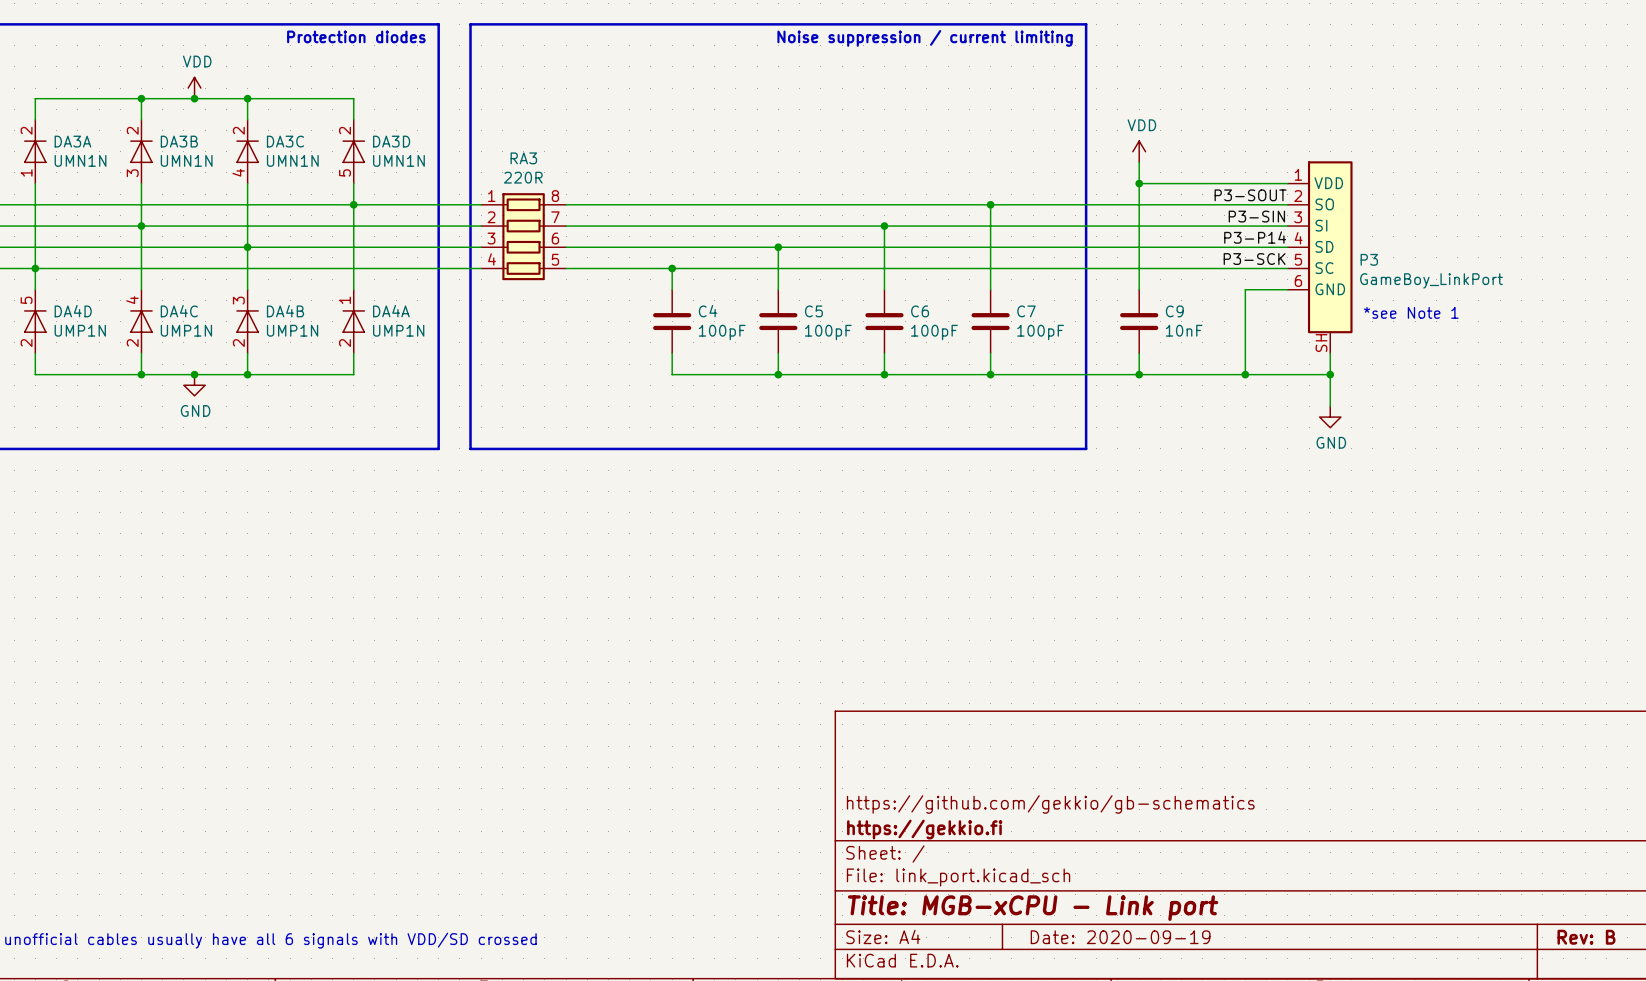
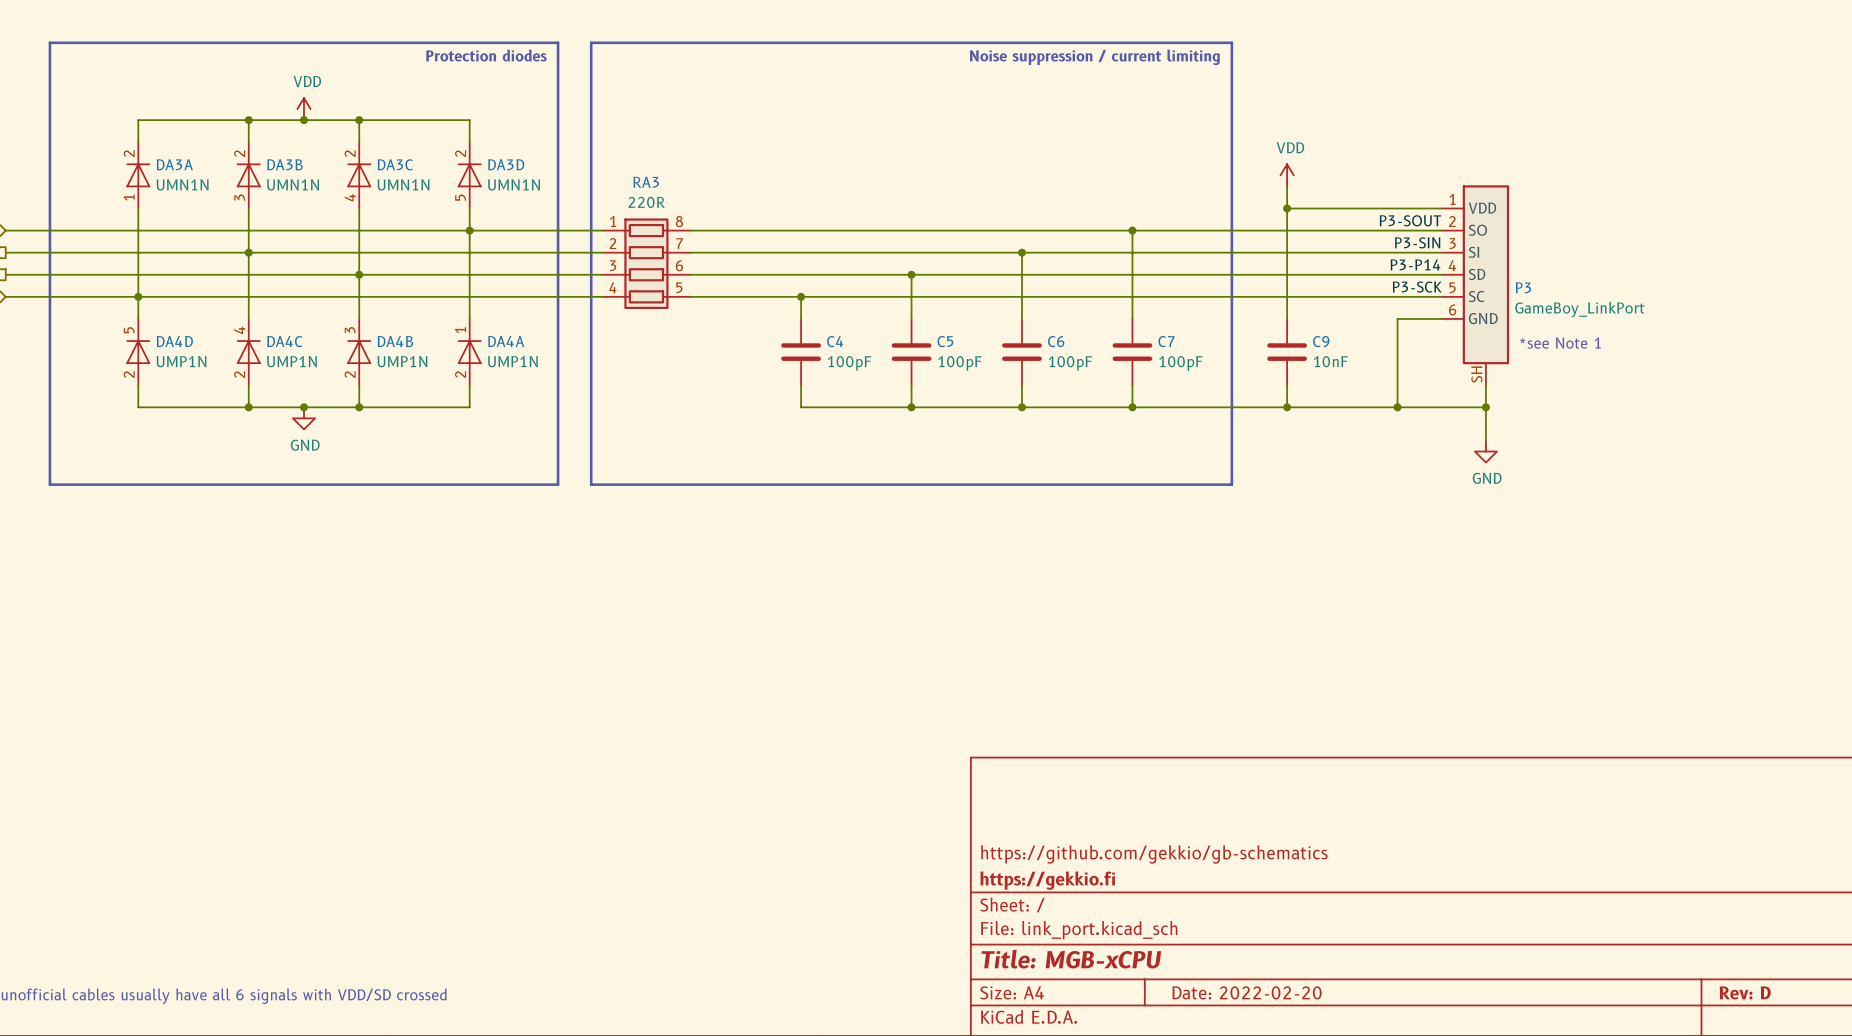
title block: Title: MGB-xCPU - Link port (1033, 908) -> Title: MGB-xCPU (1071, 959)
title block: Date: 2020-09-19 (1120, 937) -> Date: 2022-02-20 (1246, 992)
title block: Rev: B (1586, 937) -> Rev: D (1745, 992)

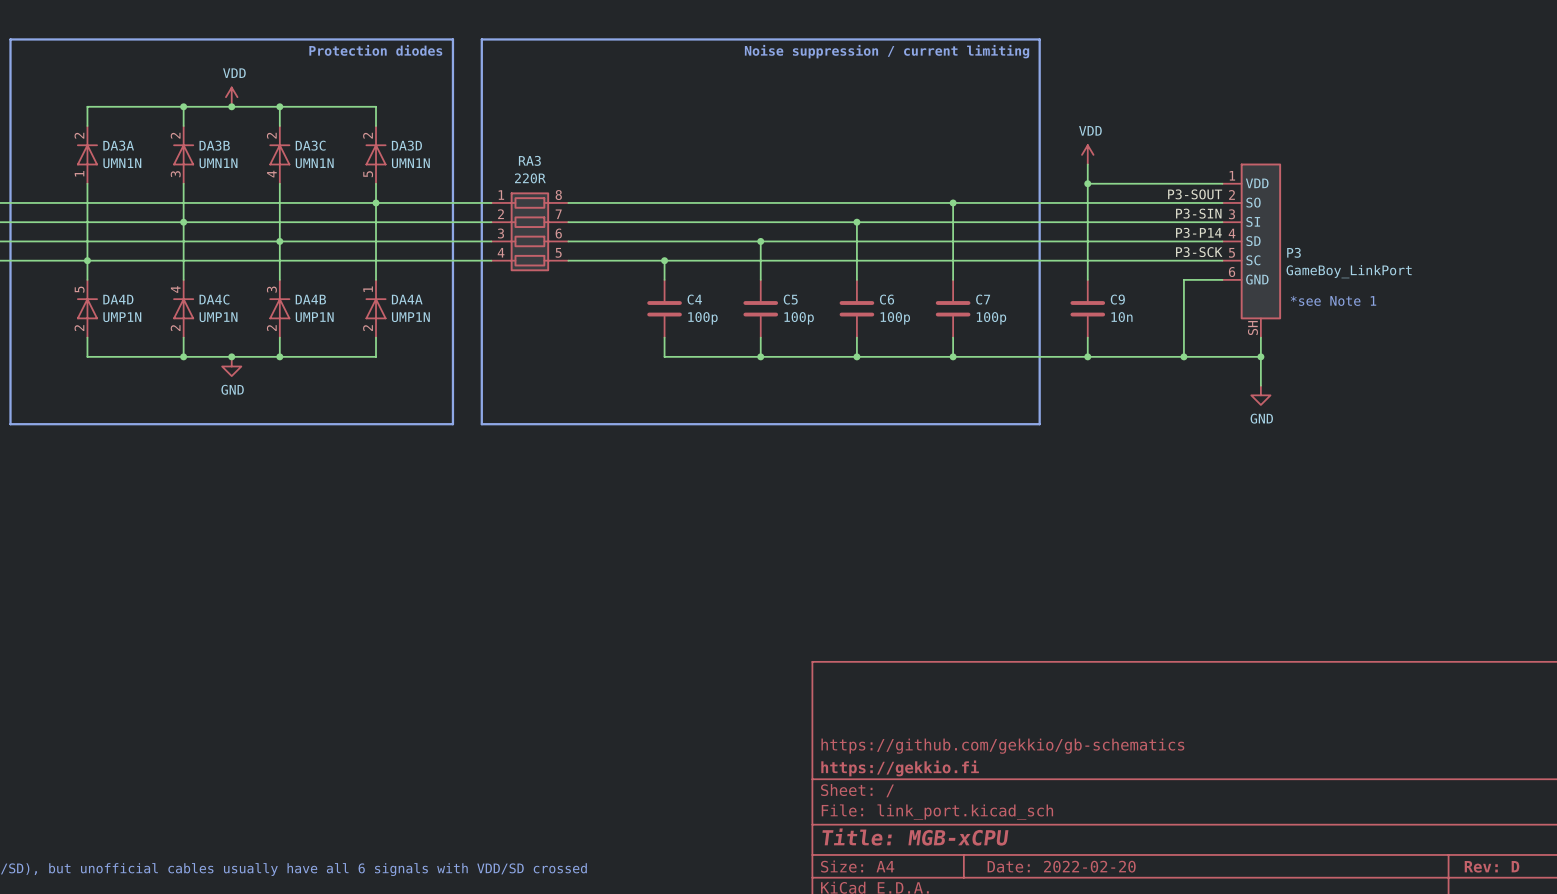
C9 value: 10nF (1330, 361) -> 10n (1122, 317)
C4 value: 100pF (849, 363) -> 100p (702, 318)
C5 value: 100pF (959, 363) -> 100p (799, 318)
C6 value: 100pF (1070, 363) -> 100p (895, 318)
C7 value: 100pF (1180, 363) -> 100p (991, 318)

